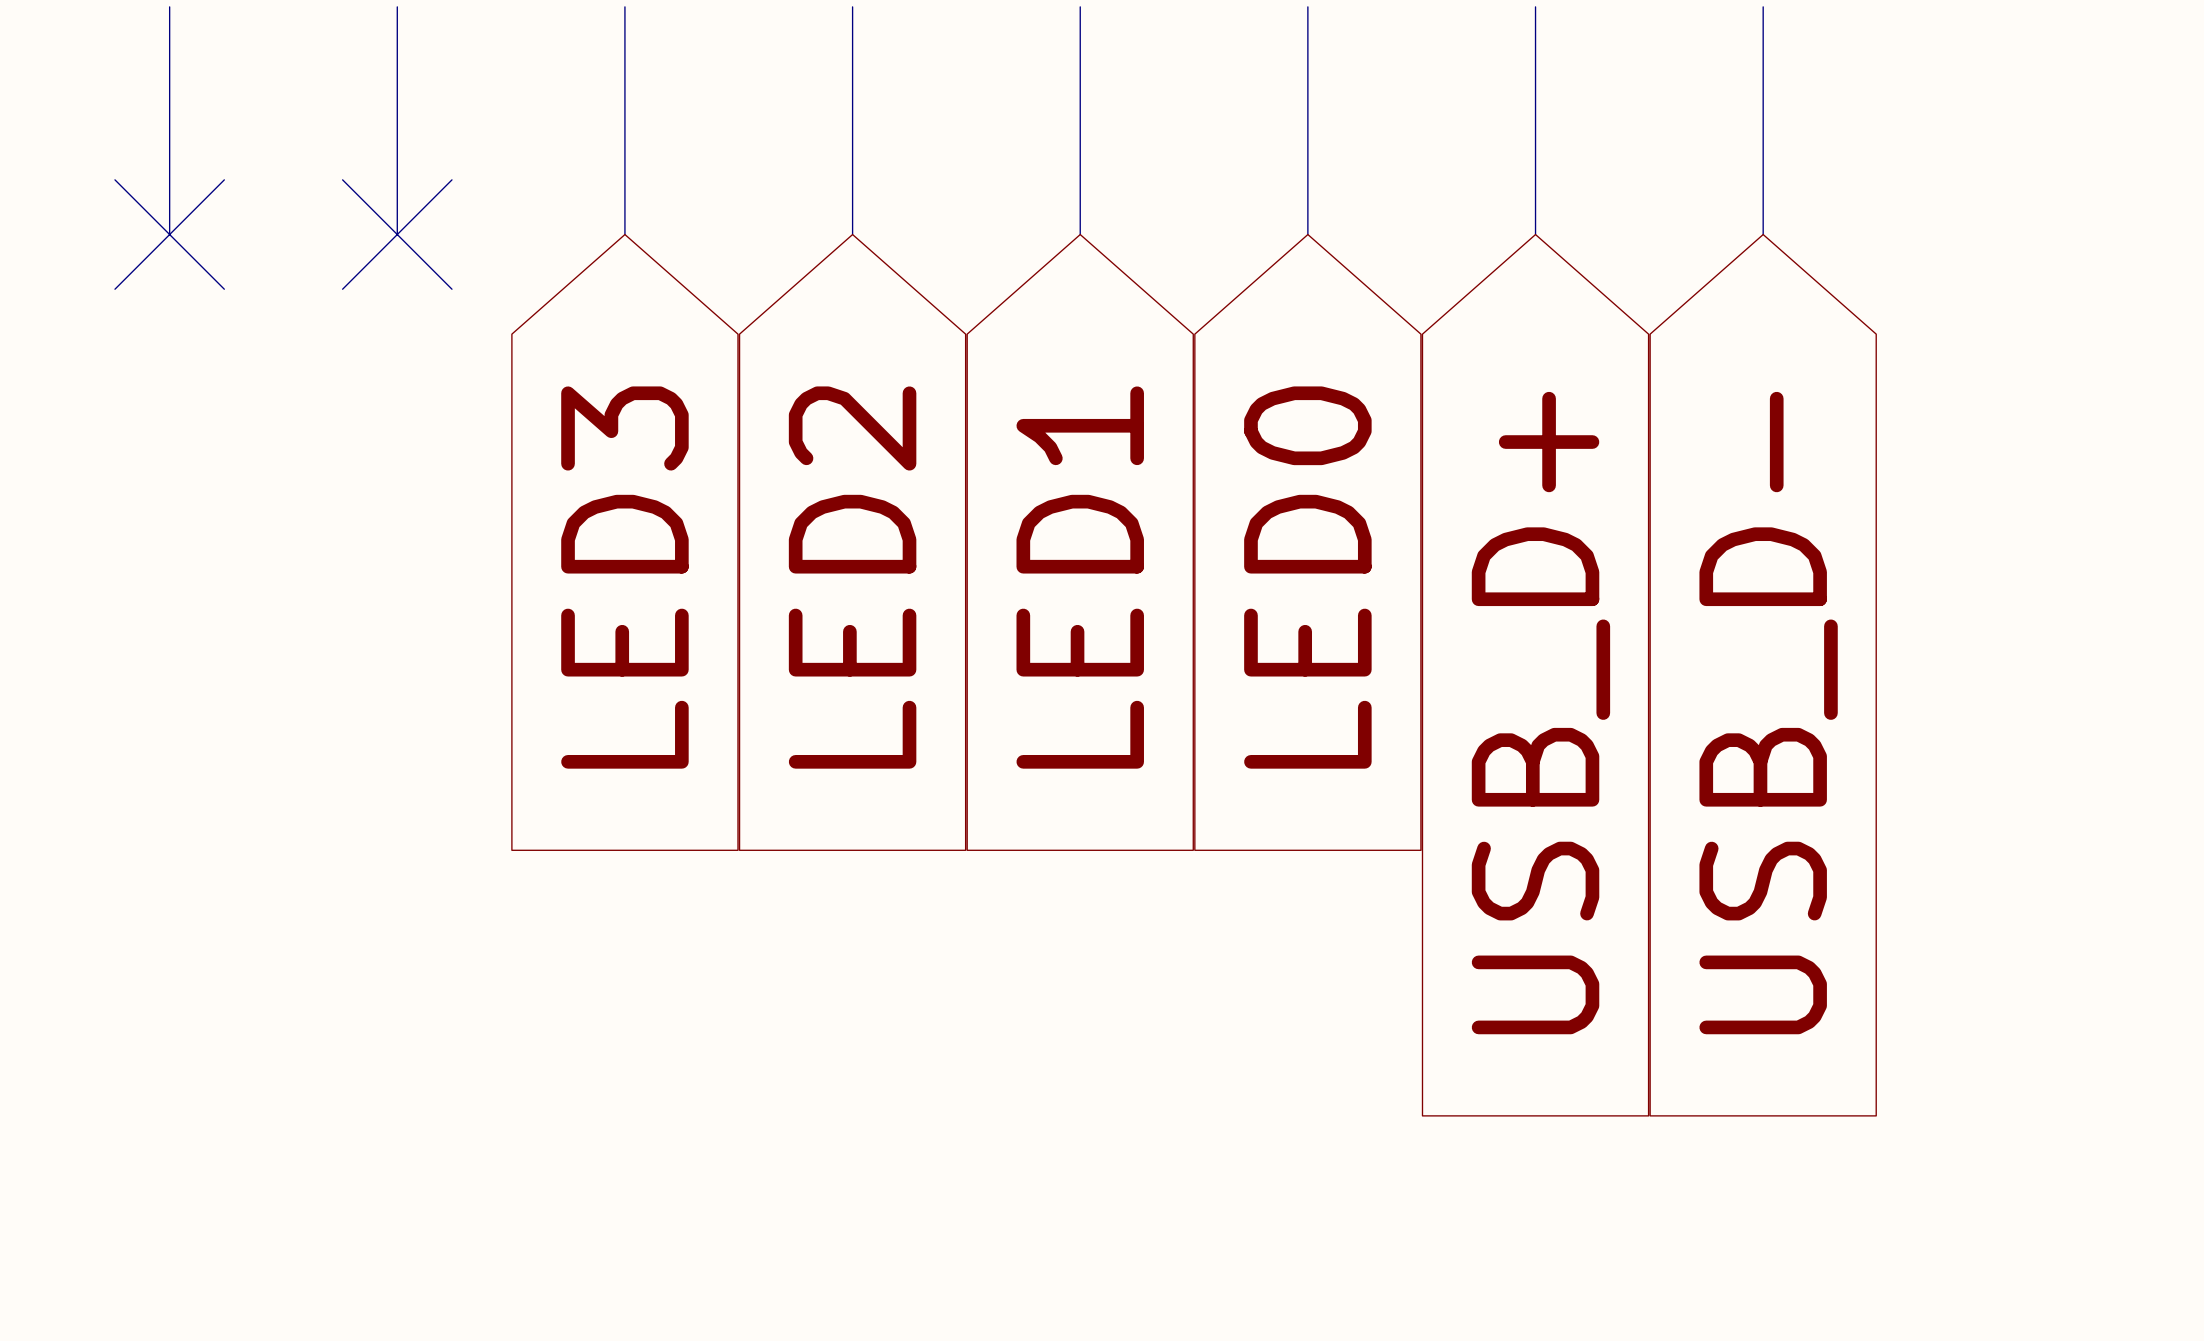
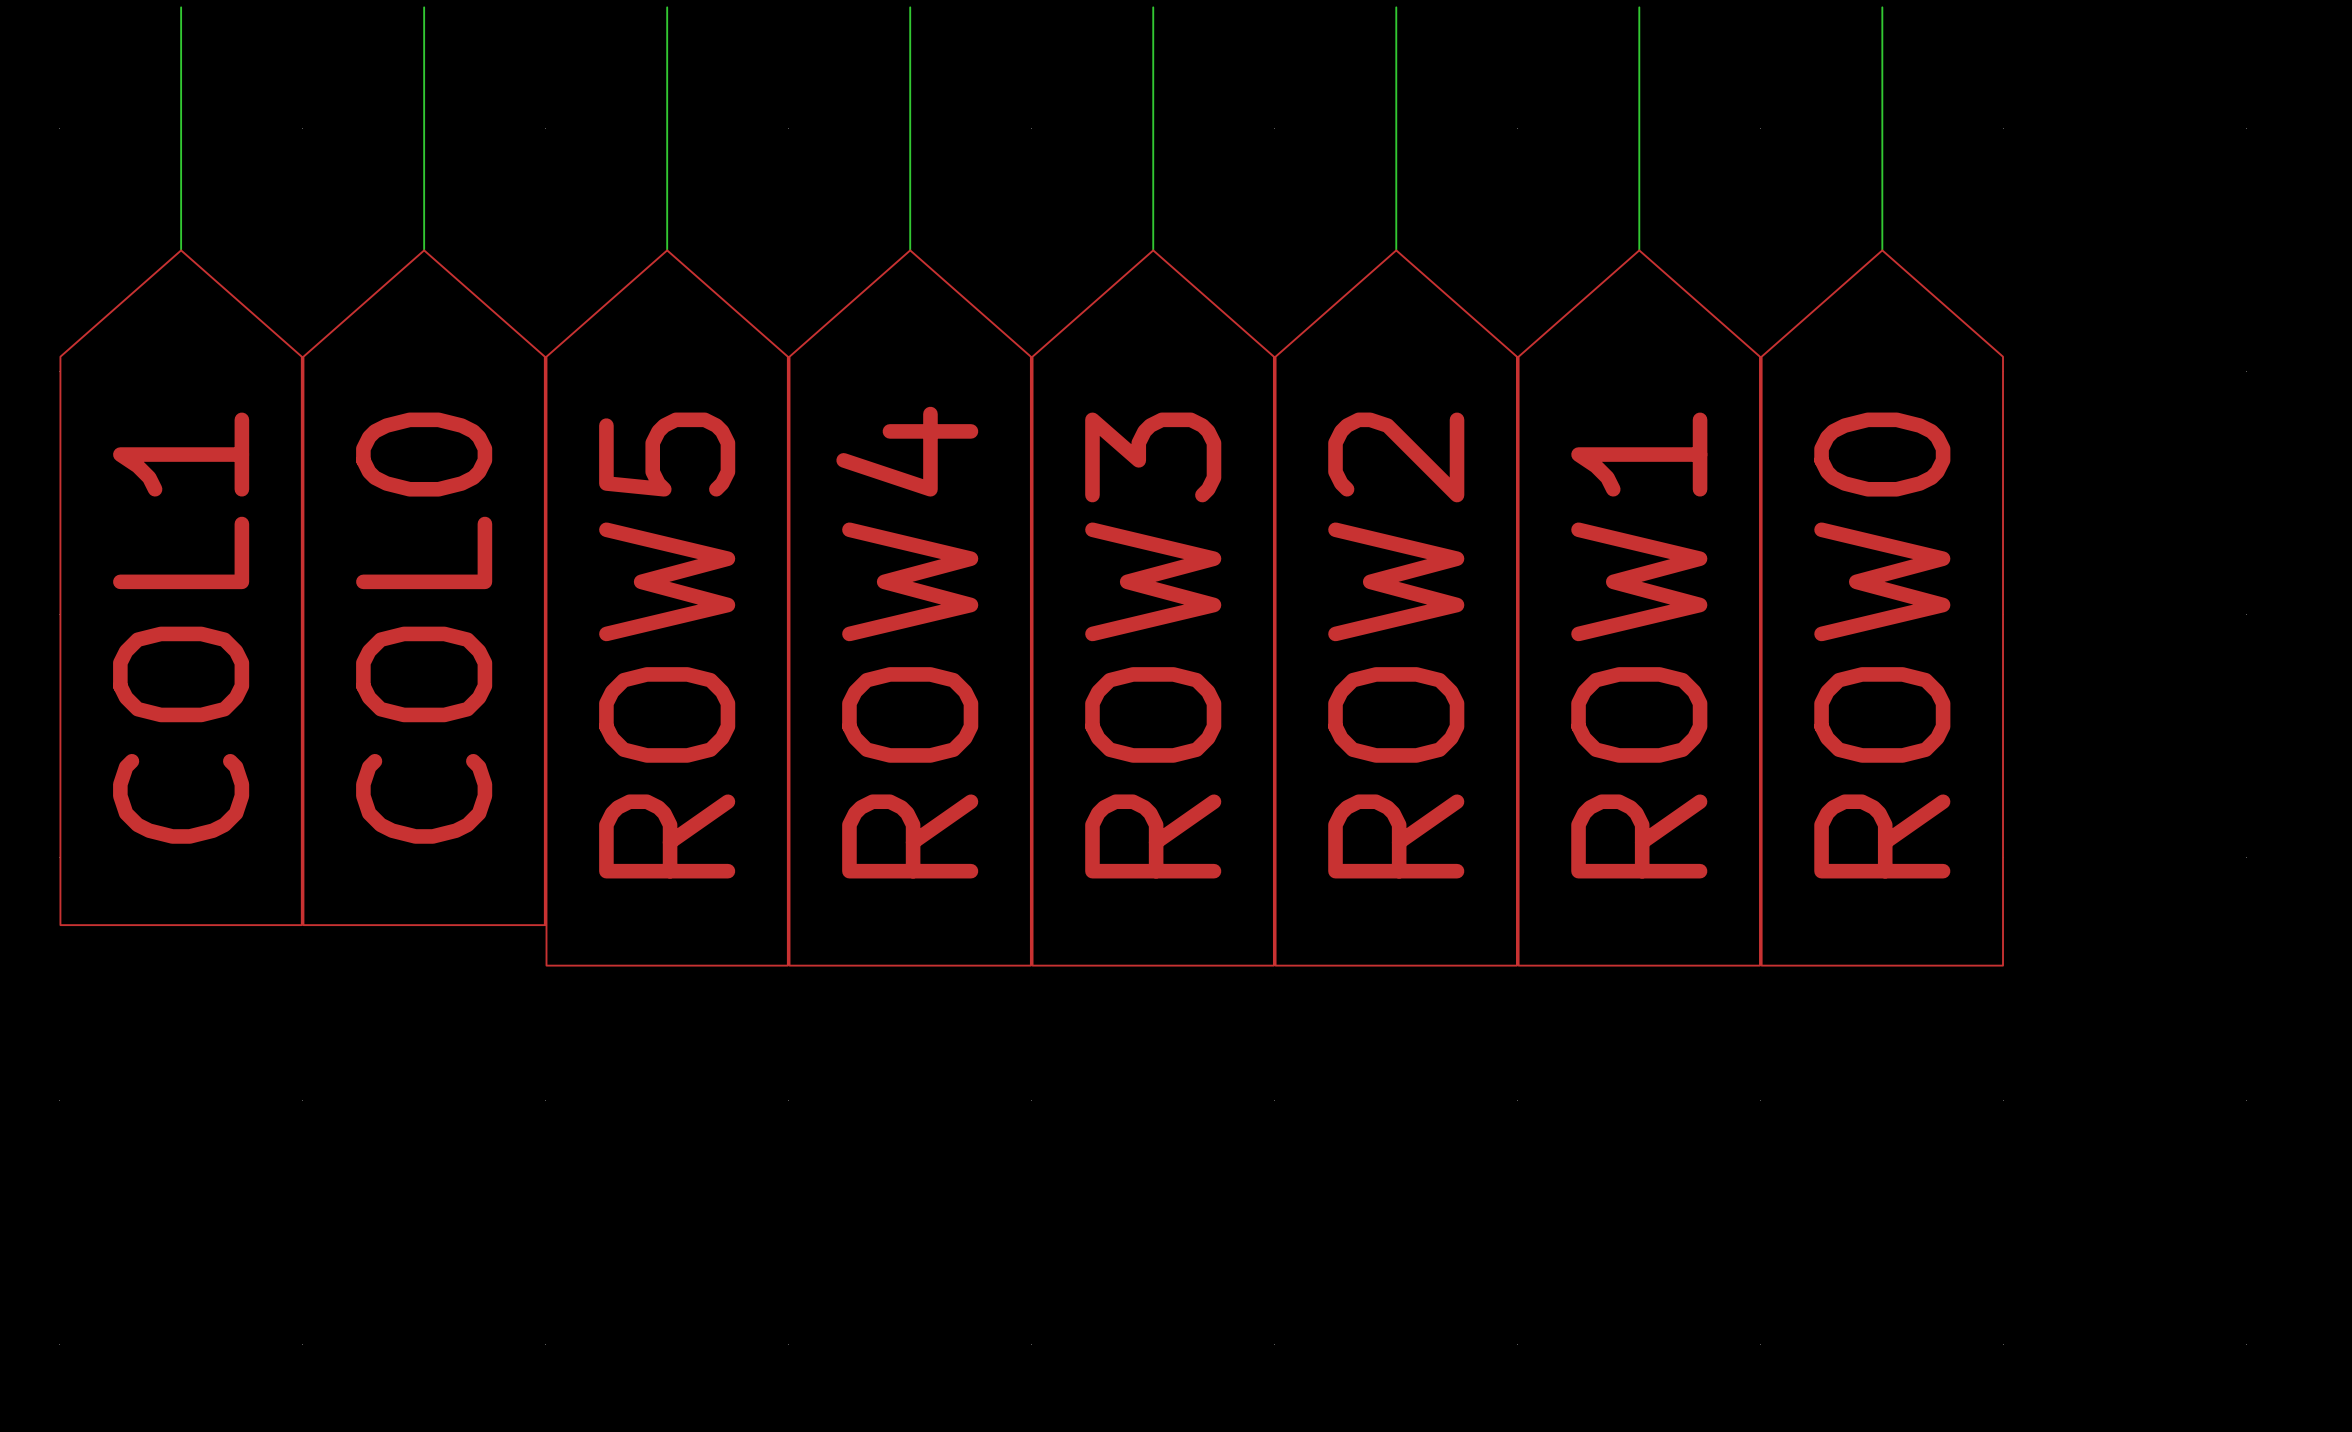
no-connect mark: (169, 234) -> none
no-connect mark: (397, 234) -> none
global label: LED3 (624, 577) -> ROW5 (667, 645)
global label: LED2 (852, 577) -> ROW4 (907, 642)
global label: LED1 (1080, 577) -> ROW3 (1153, 645)
global label: LED0 (1307, 577) -> ROW2 (1396, 645)
global label: none -> COL1 (181, 628)
global label: none -> COL0 (424, 628)
global label: USB_D+ (1540, 713) -> ROW1 (1639, 645)
global label: USB_D- (1768, 713) -> ROW0 (1882, 645)

